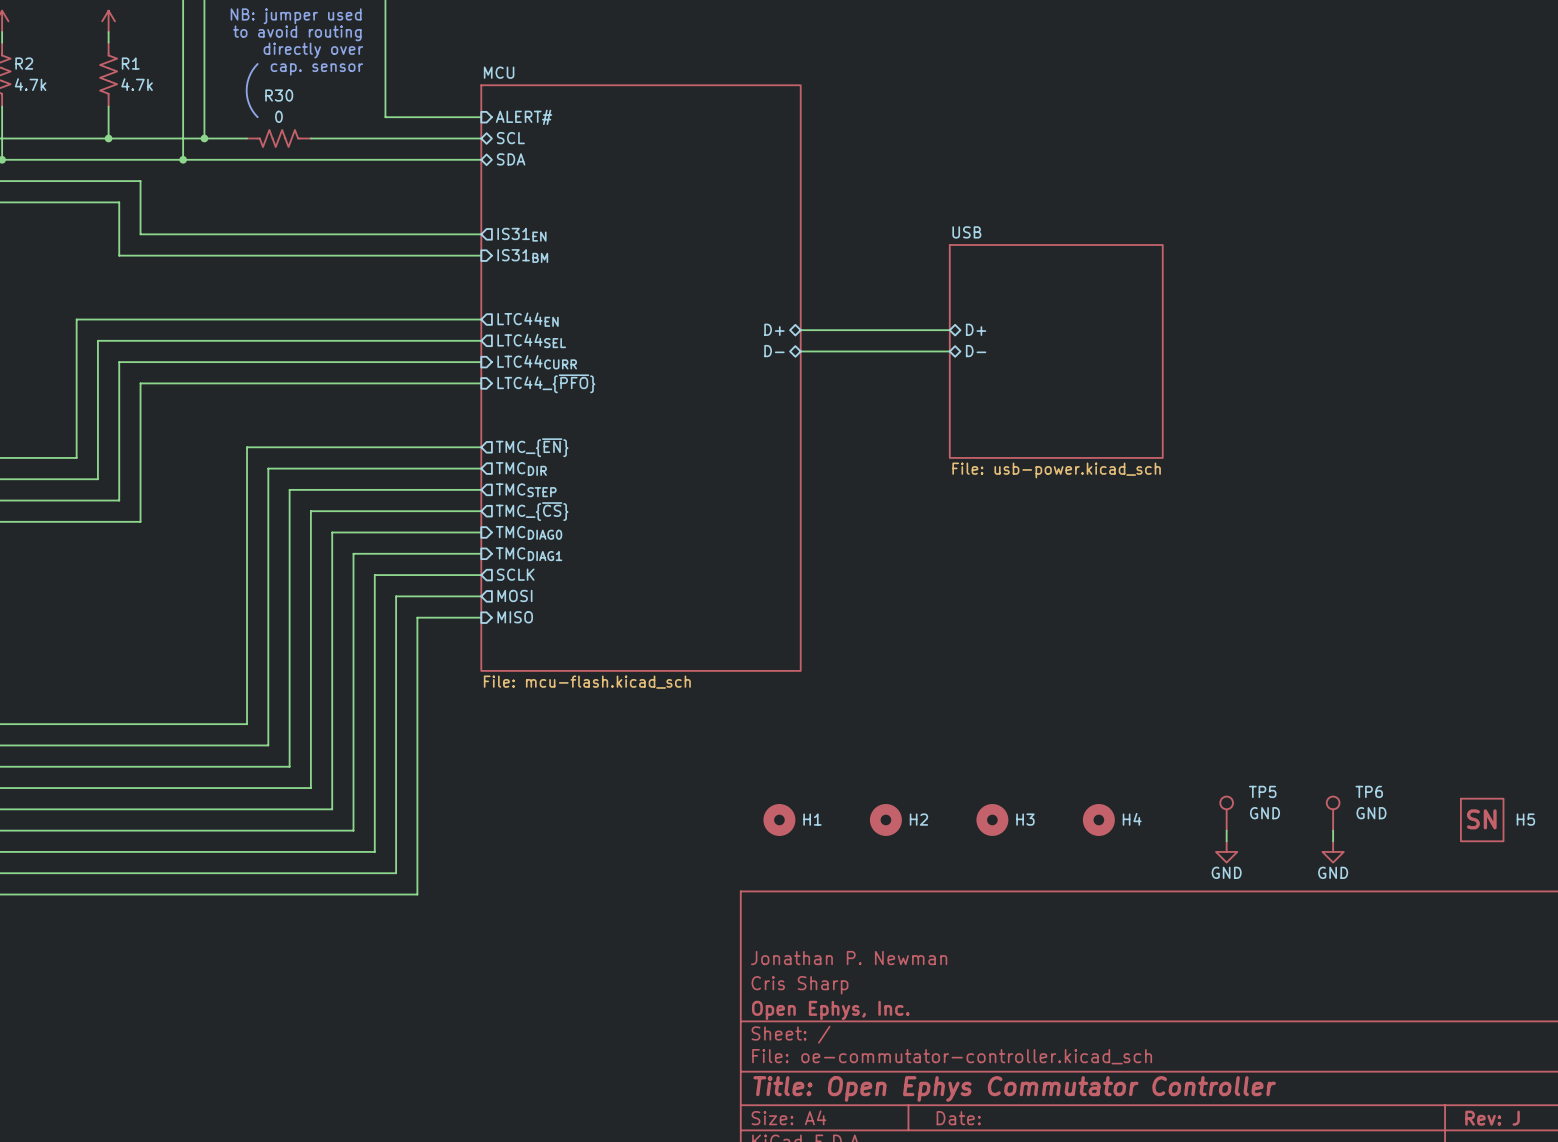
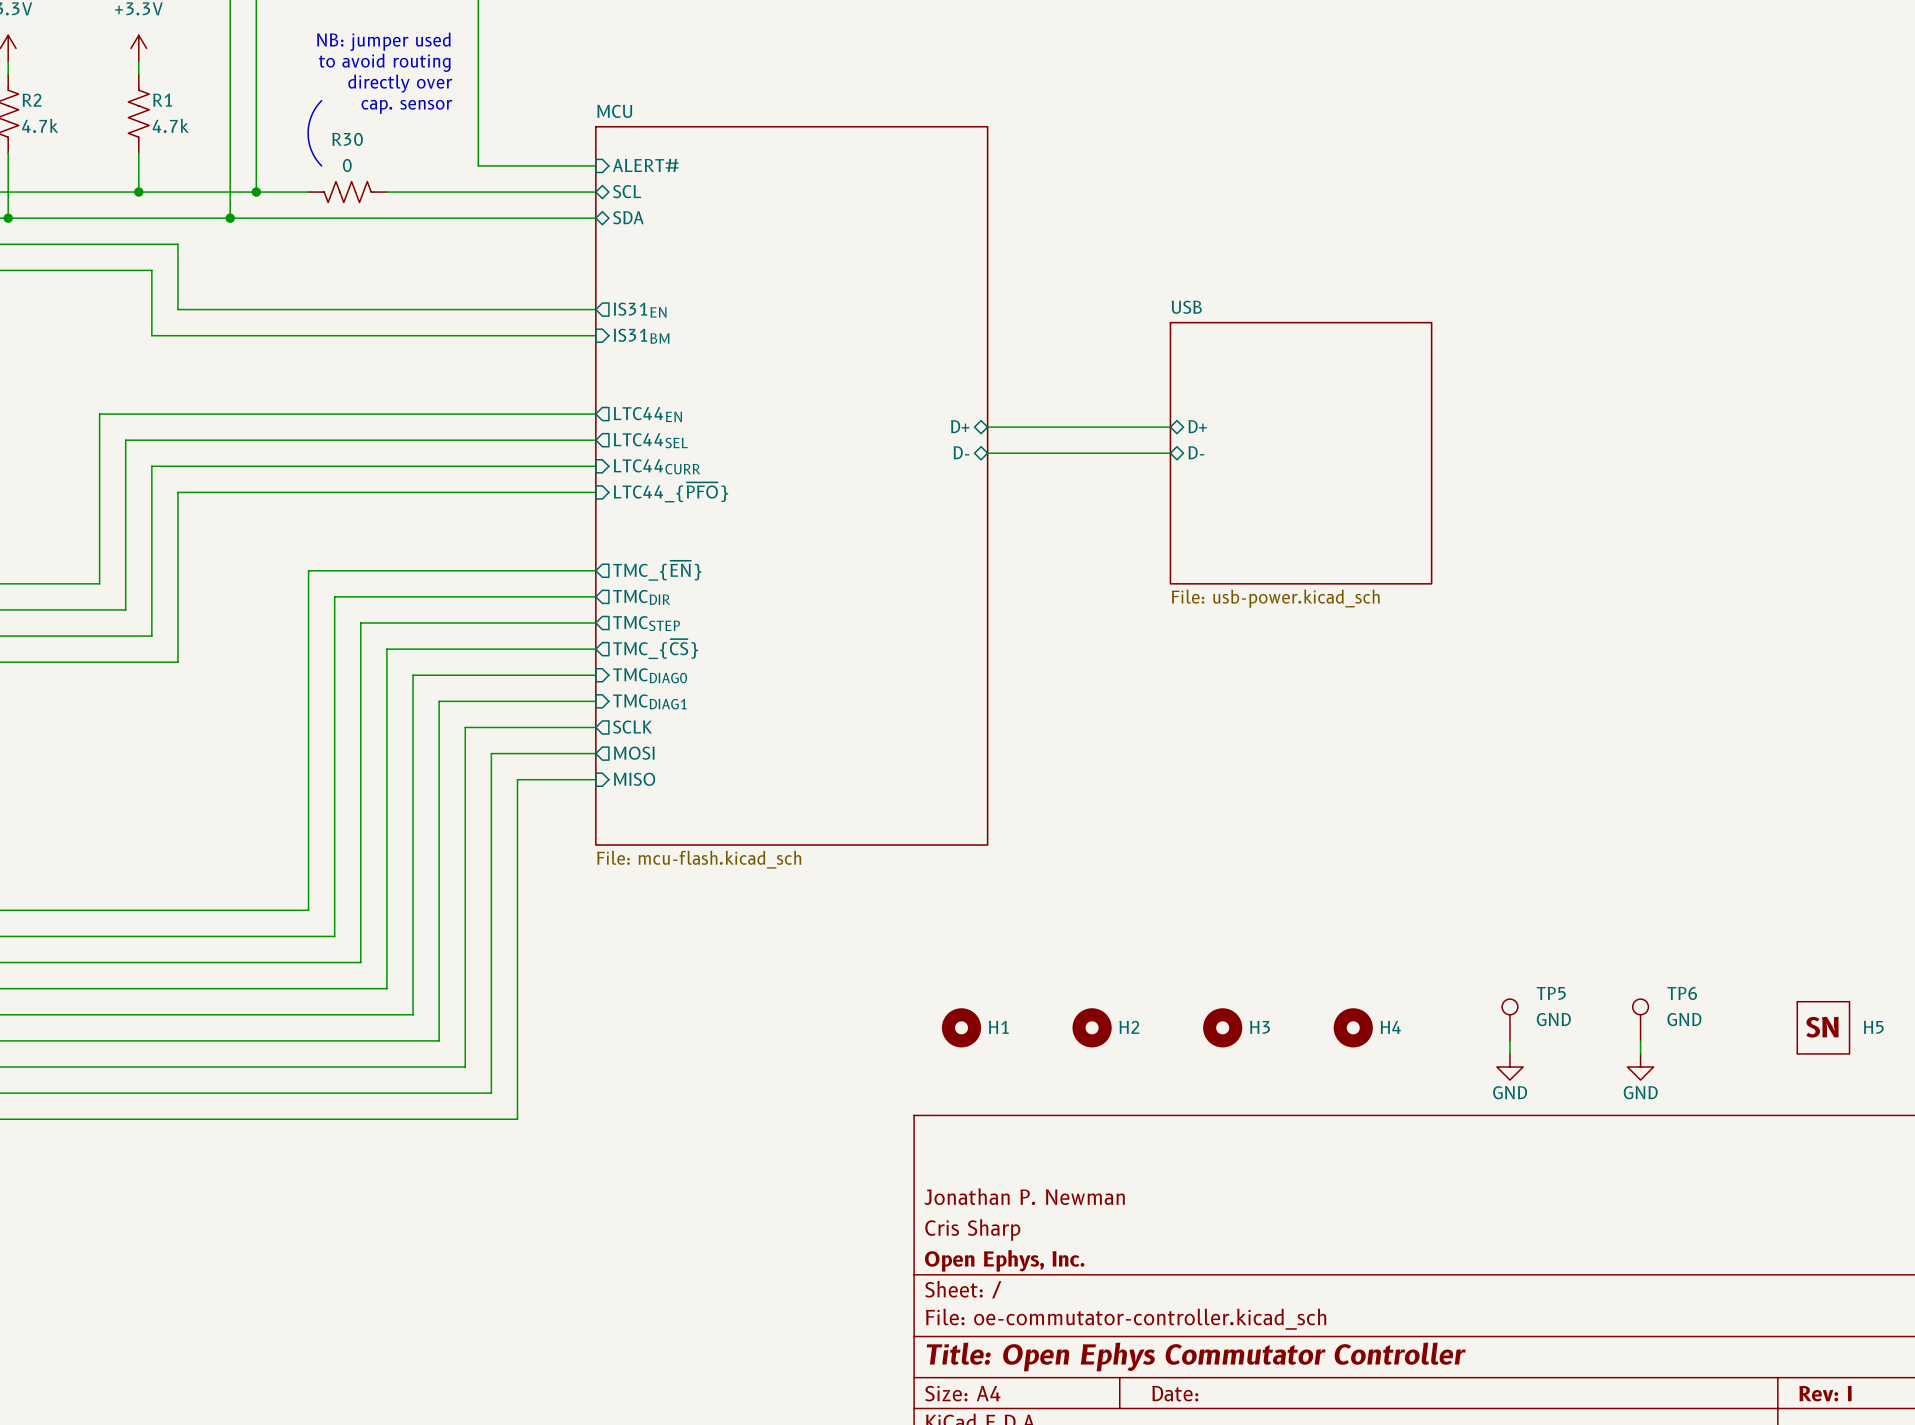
title block: Rev: J (1492, 1118) -> Rev: I (1825, 1393)

